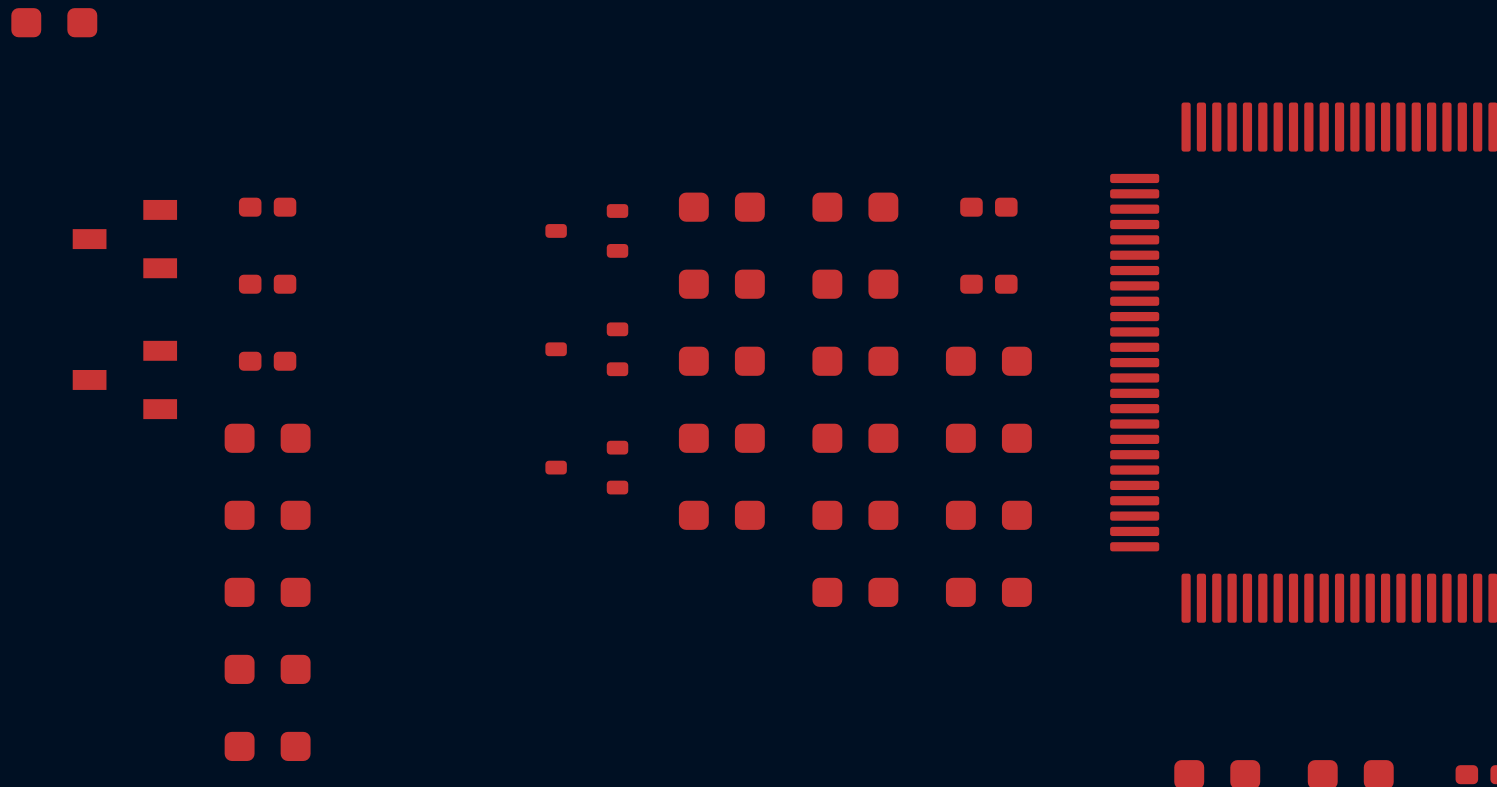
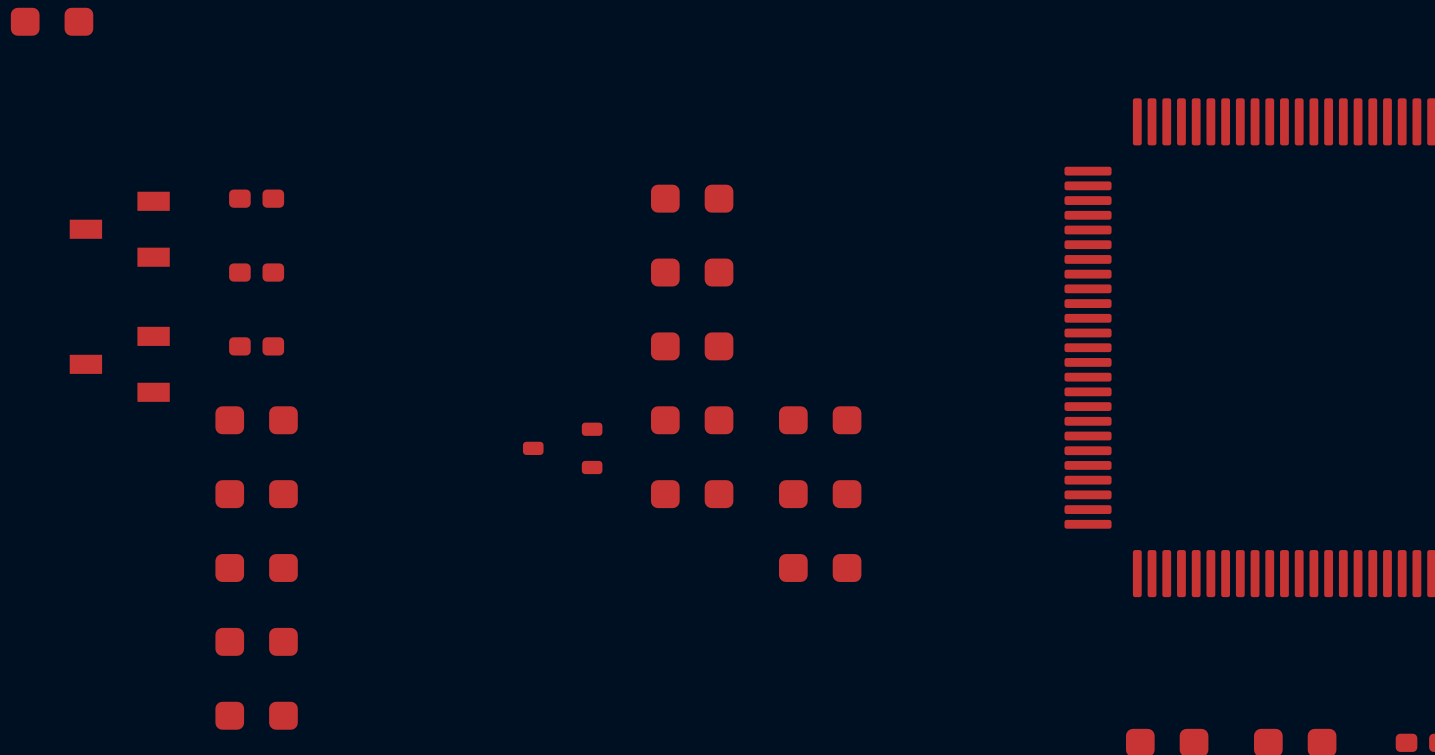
part: (855, 207) -> none
part: (988, 207) -> none
part: (586, 230) -> none
part: (855, 284) -> none
part: (988, 284) -> none
part: (586, 349) -> none
part: (855, 361) -> none
part: (988, 361) -> none
part: (988, 438) -> none
part: (988, 515) -> none
part: (988, 592) -> none

